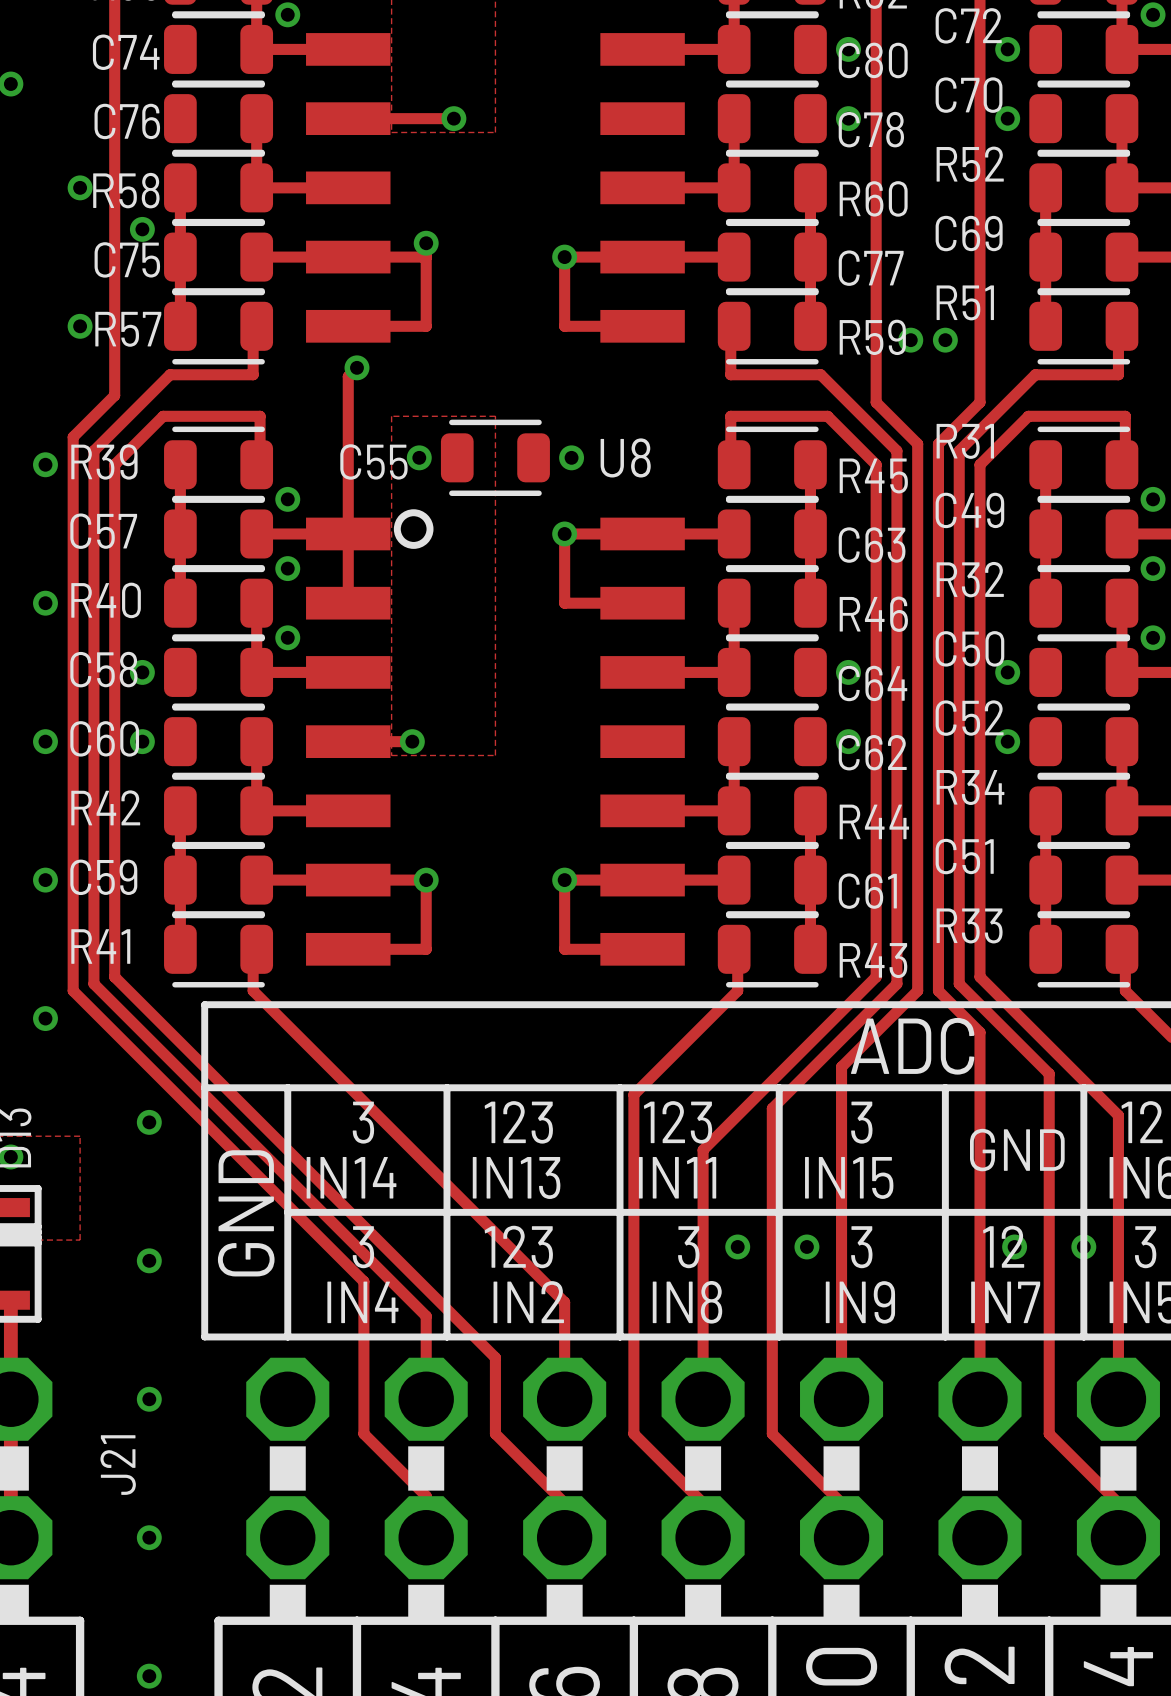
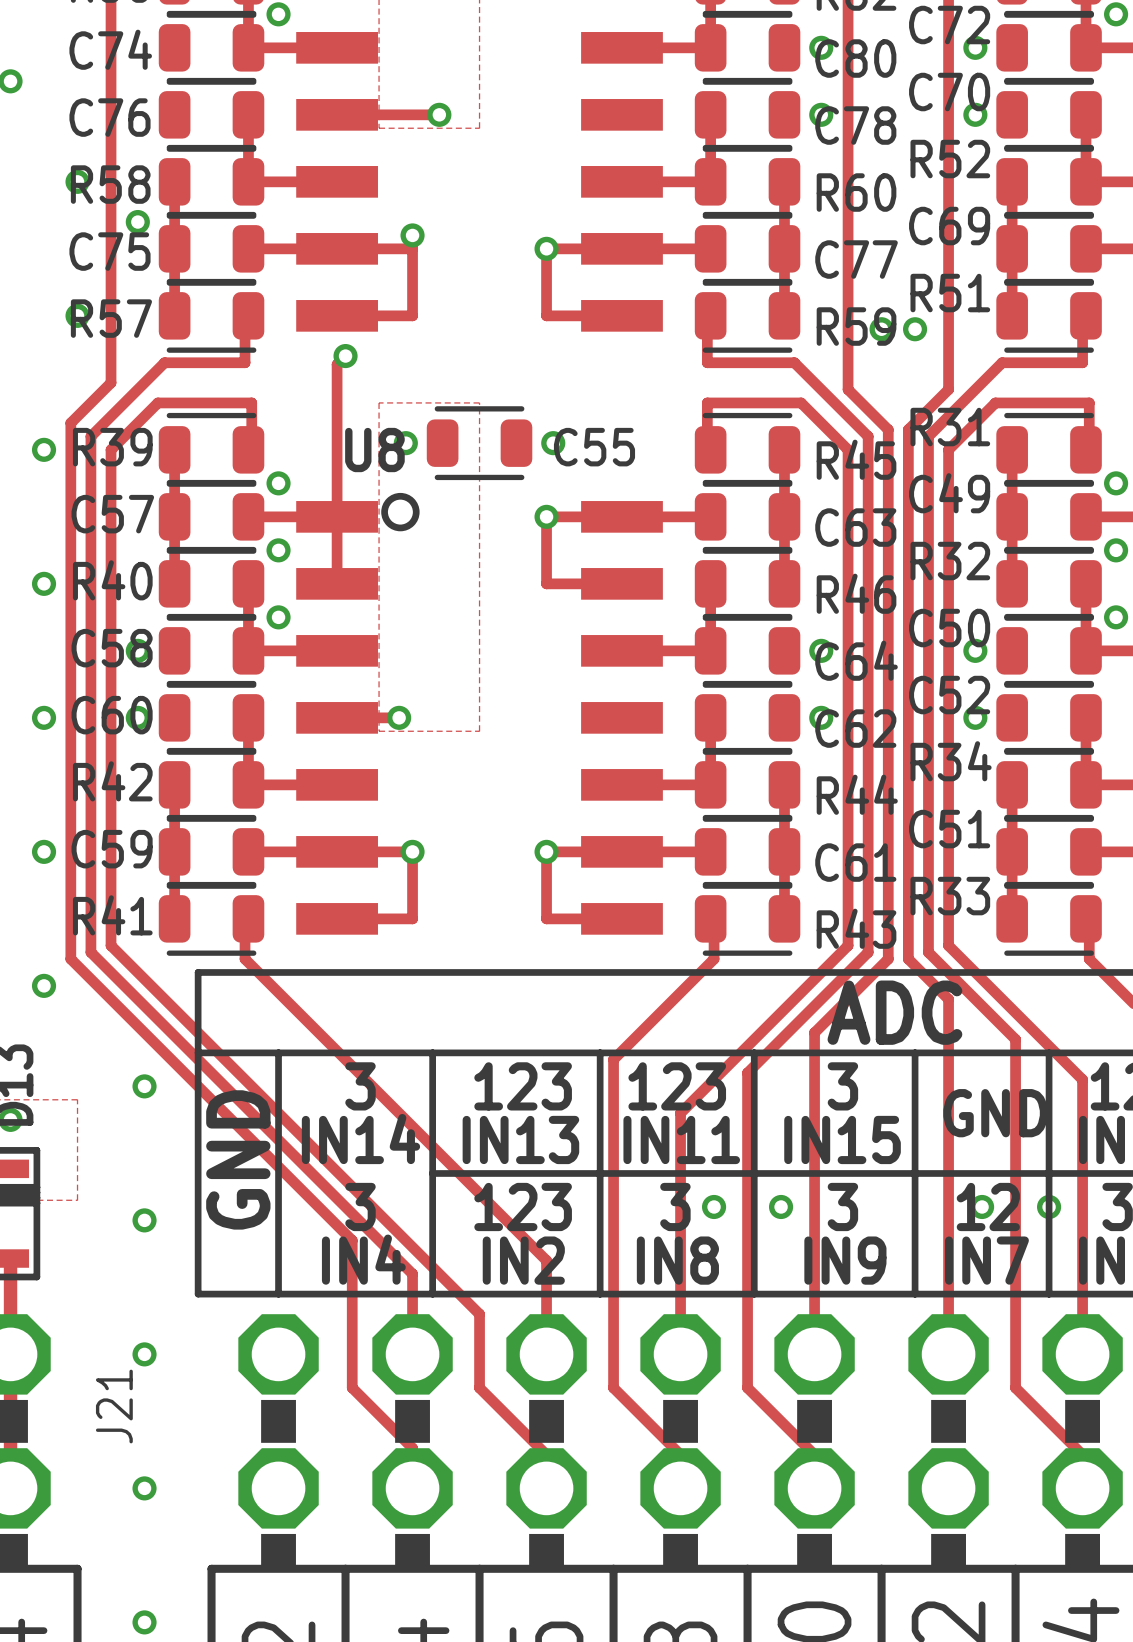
U8 name position: U8 (625, 457) -> U8 (374, 450)
C55 name position: C55 (373, 461) -> C55 (594, 447)
line: (287, 1212) (446, 1212) -> none

